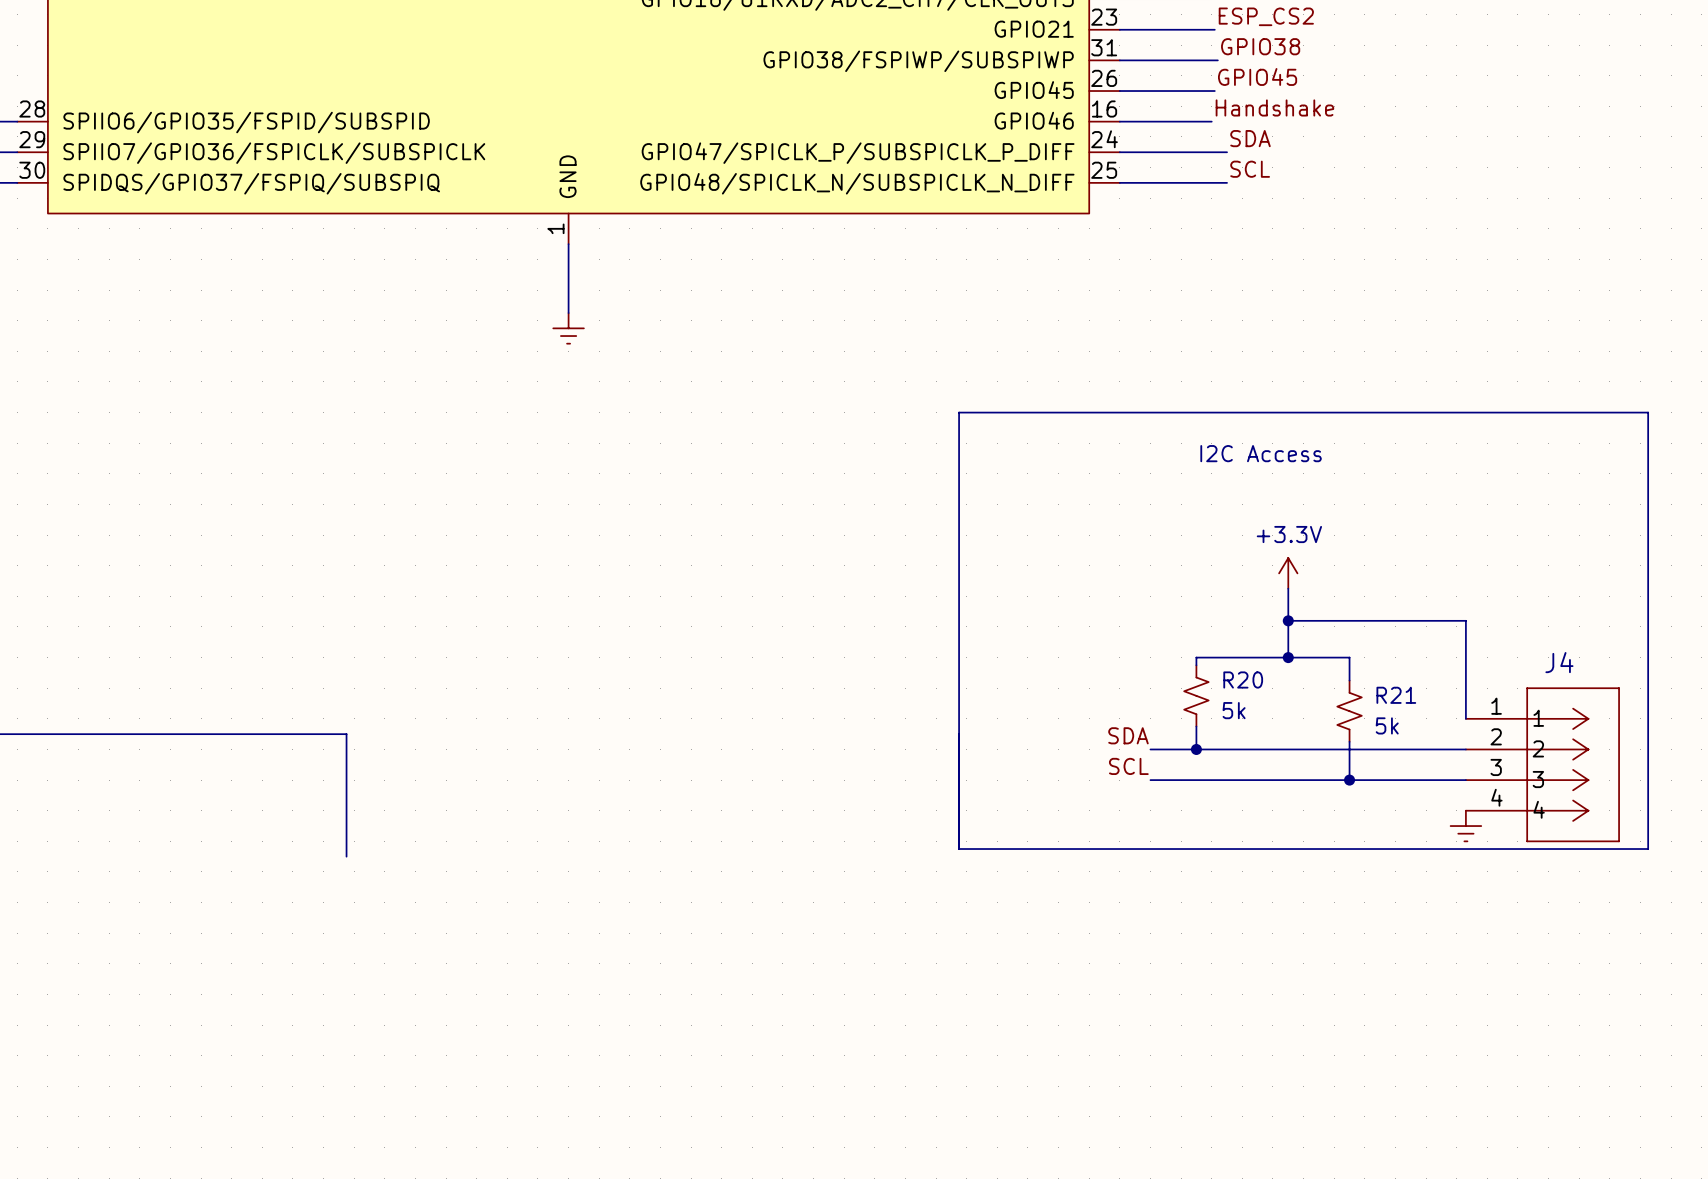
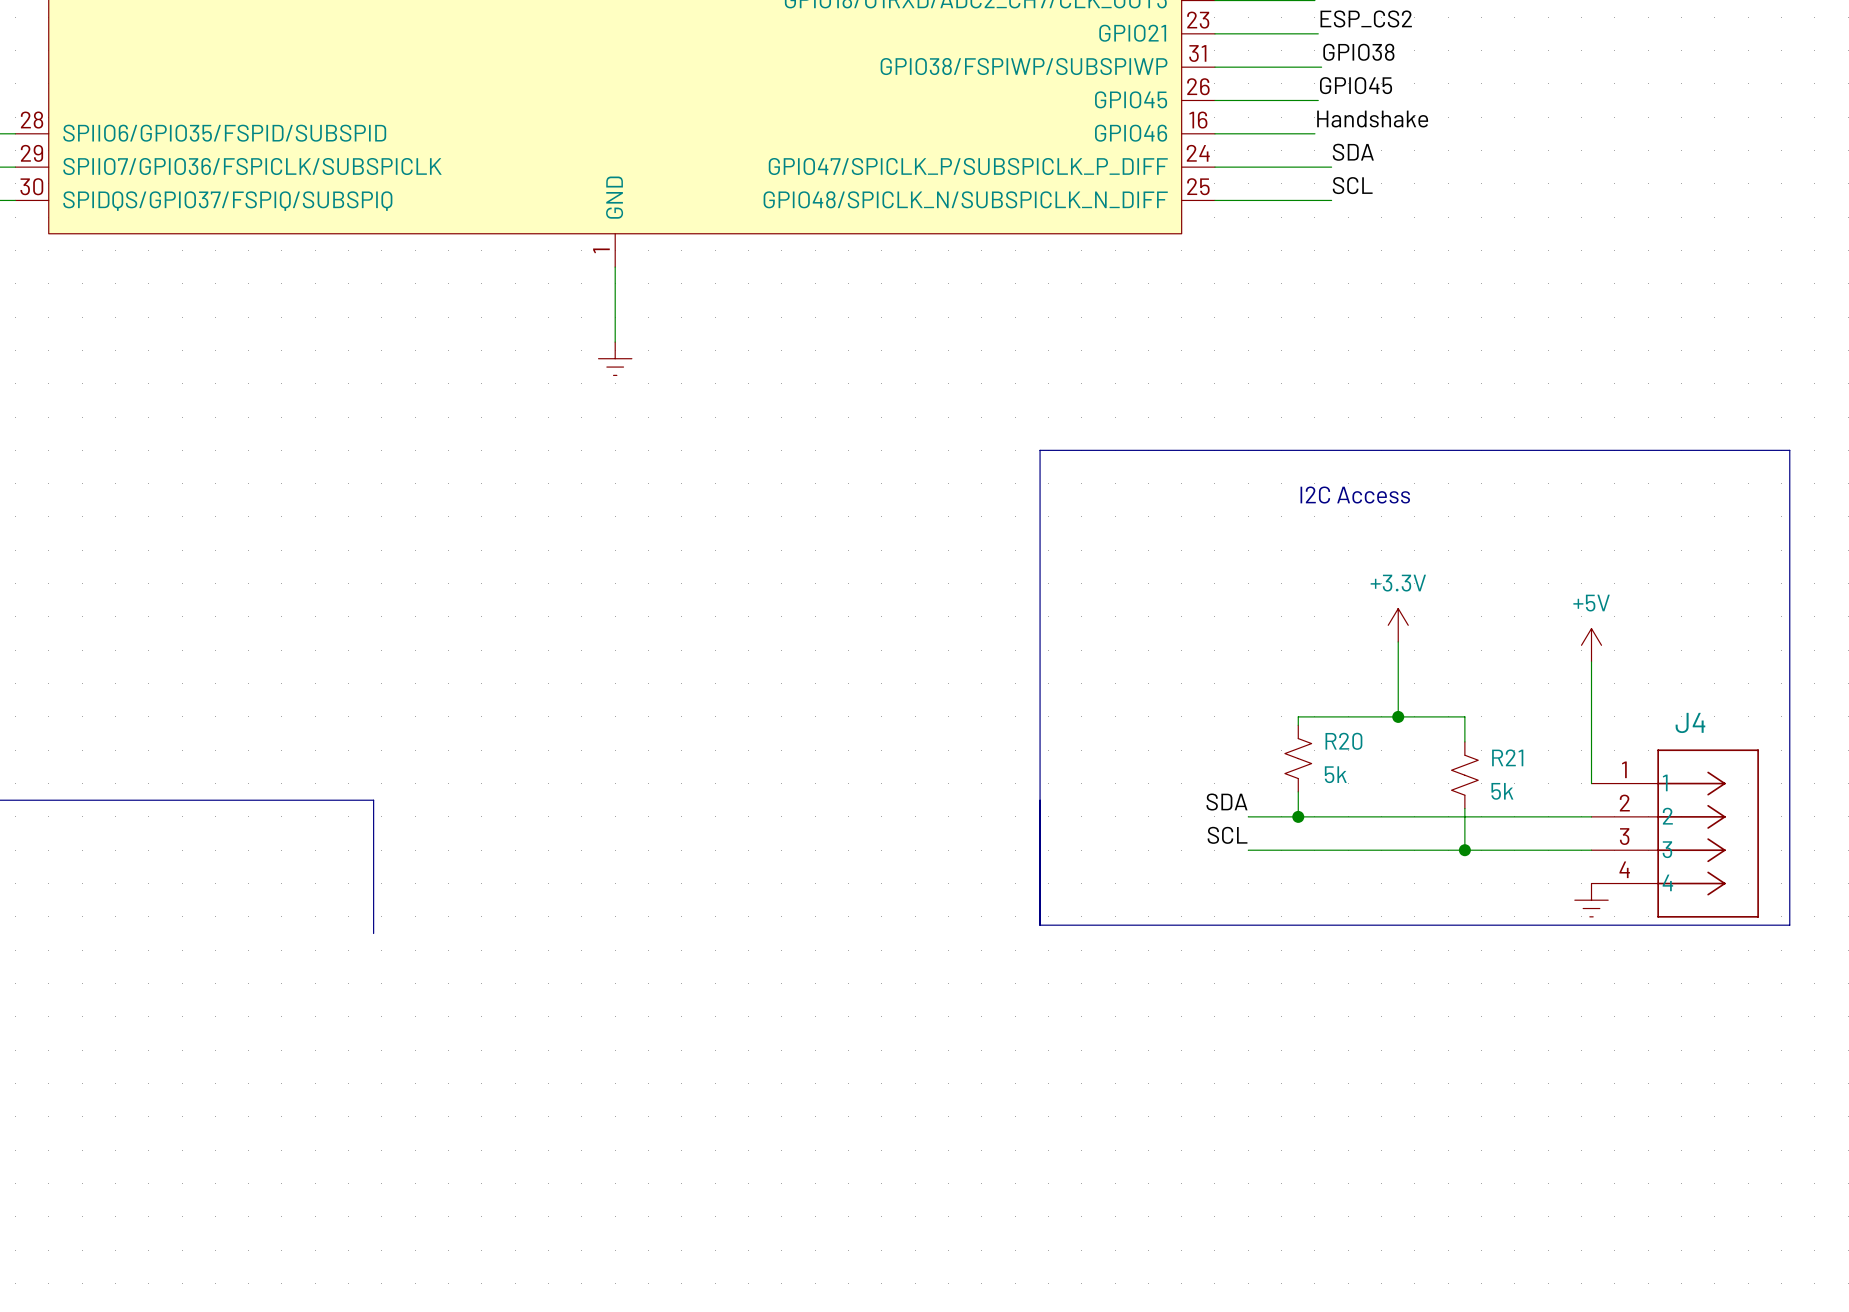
power symbol: none -> +5V (1591, 645)
wire: (1288, 620) (1465, 620) -> (1591, 661) (1591, 676)
junction: (1288, 620) -> none

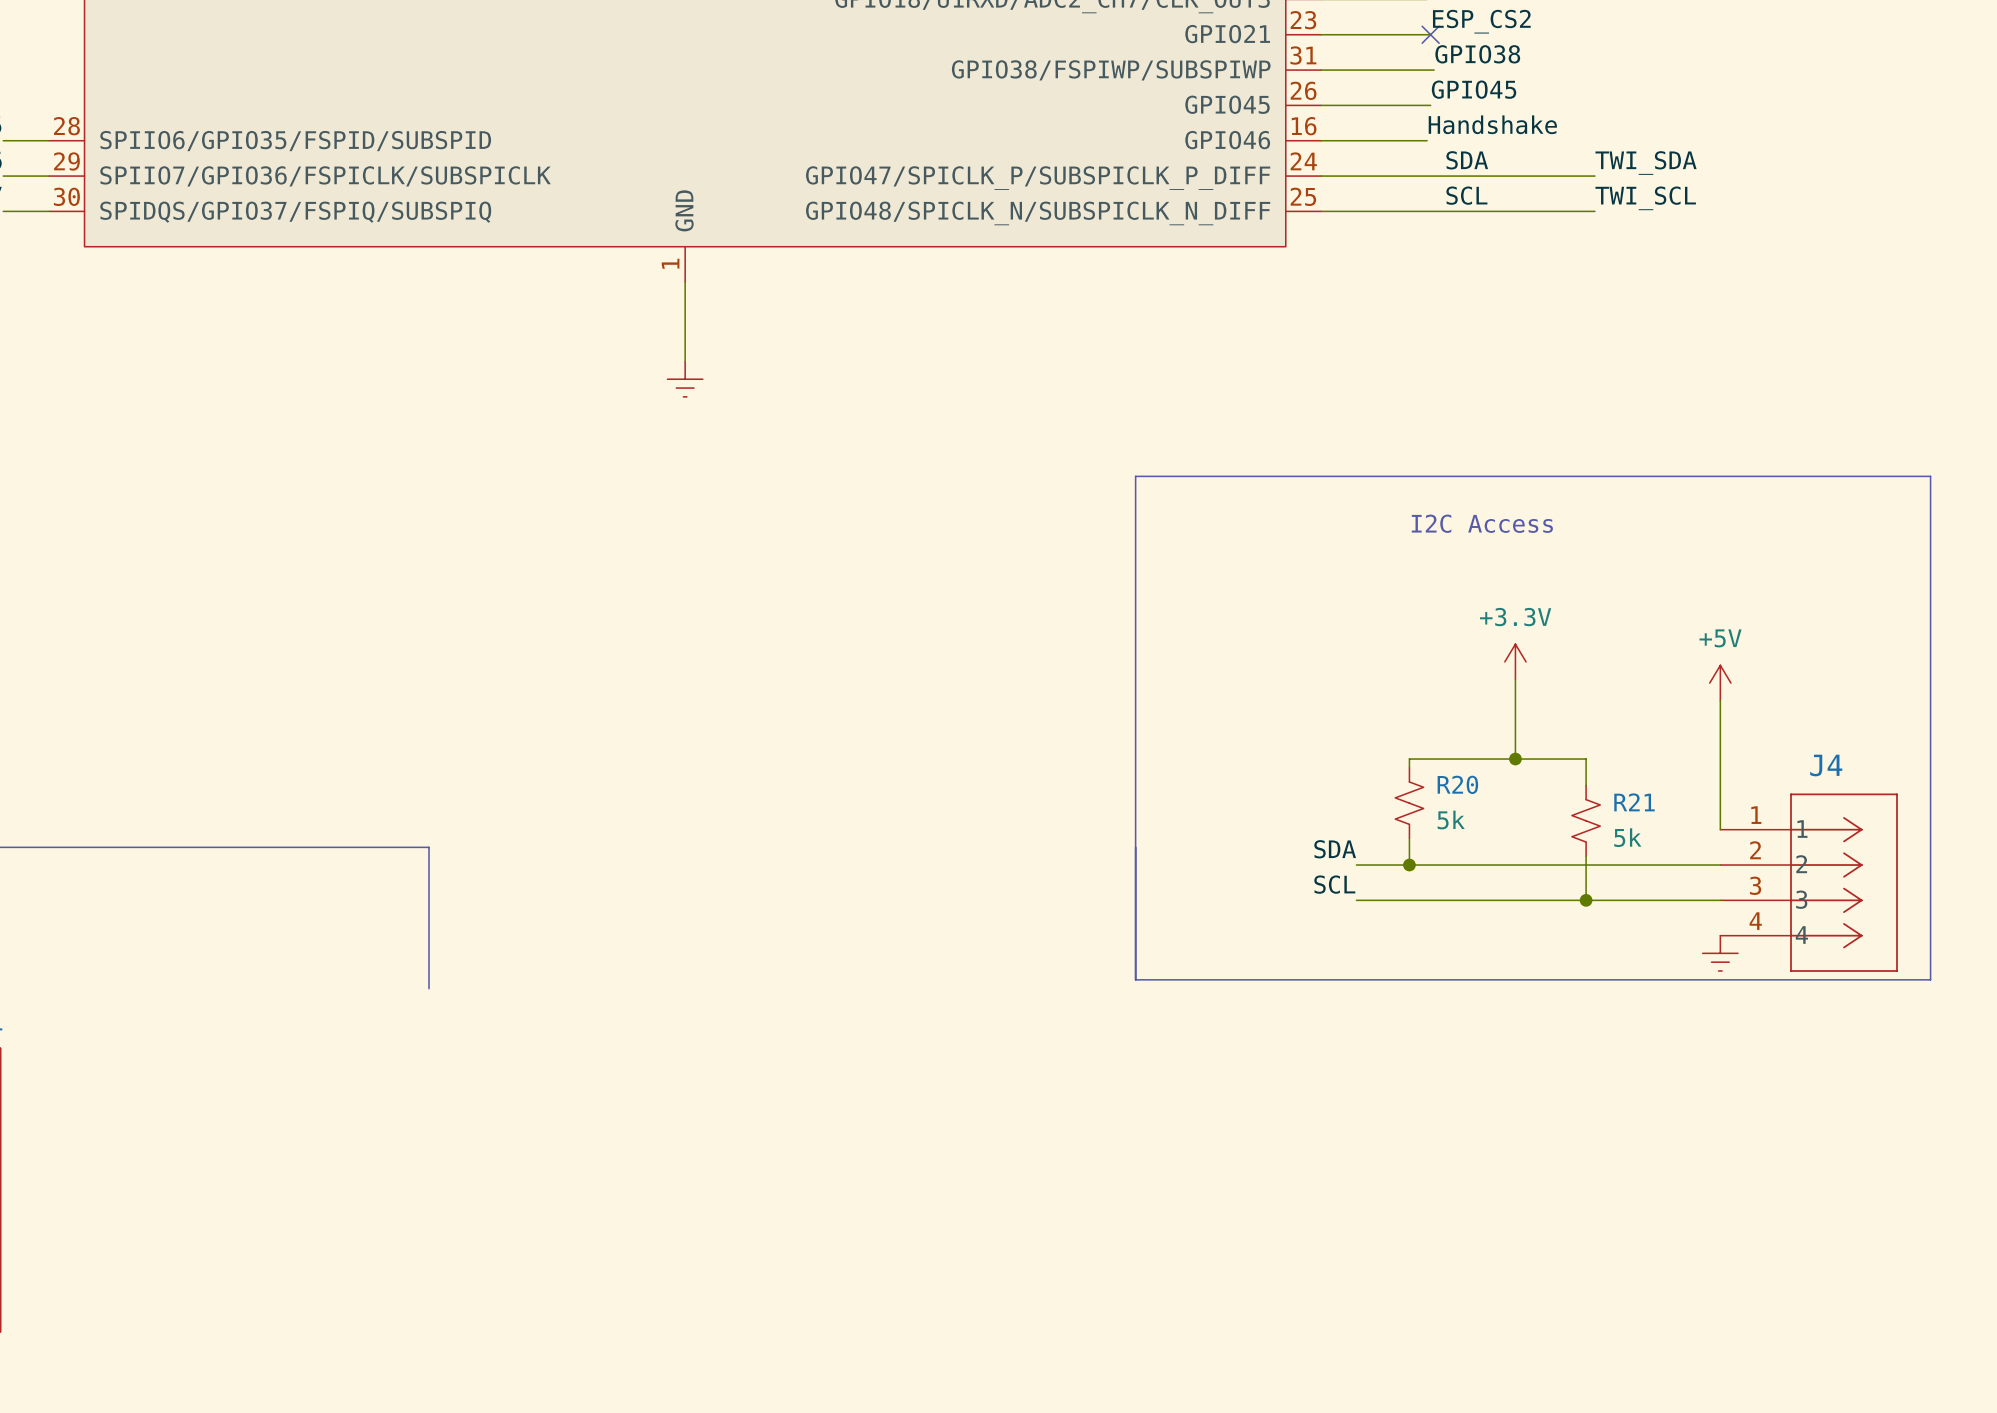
no-connect mark: none -> (1430, 34)
label: none -> TWI_SDA (1646, 162)
wire: none -> (1444, 176) (1594, 176)
label: none -> TWI_SCL (1645, 198)
wire: none -> (1444, 211) (1594, 211)

